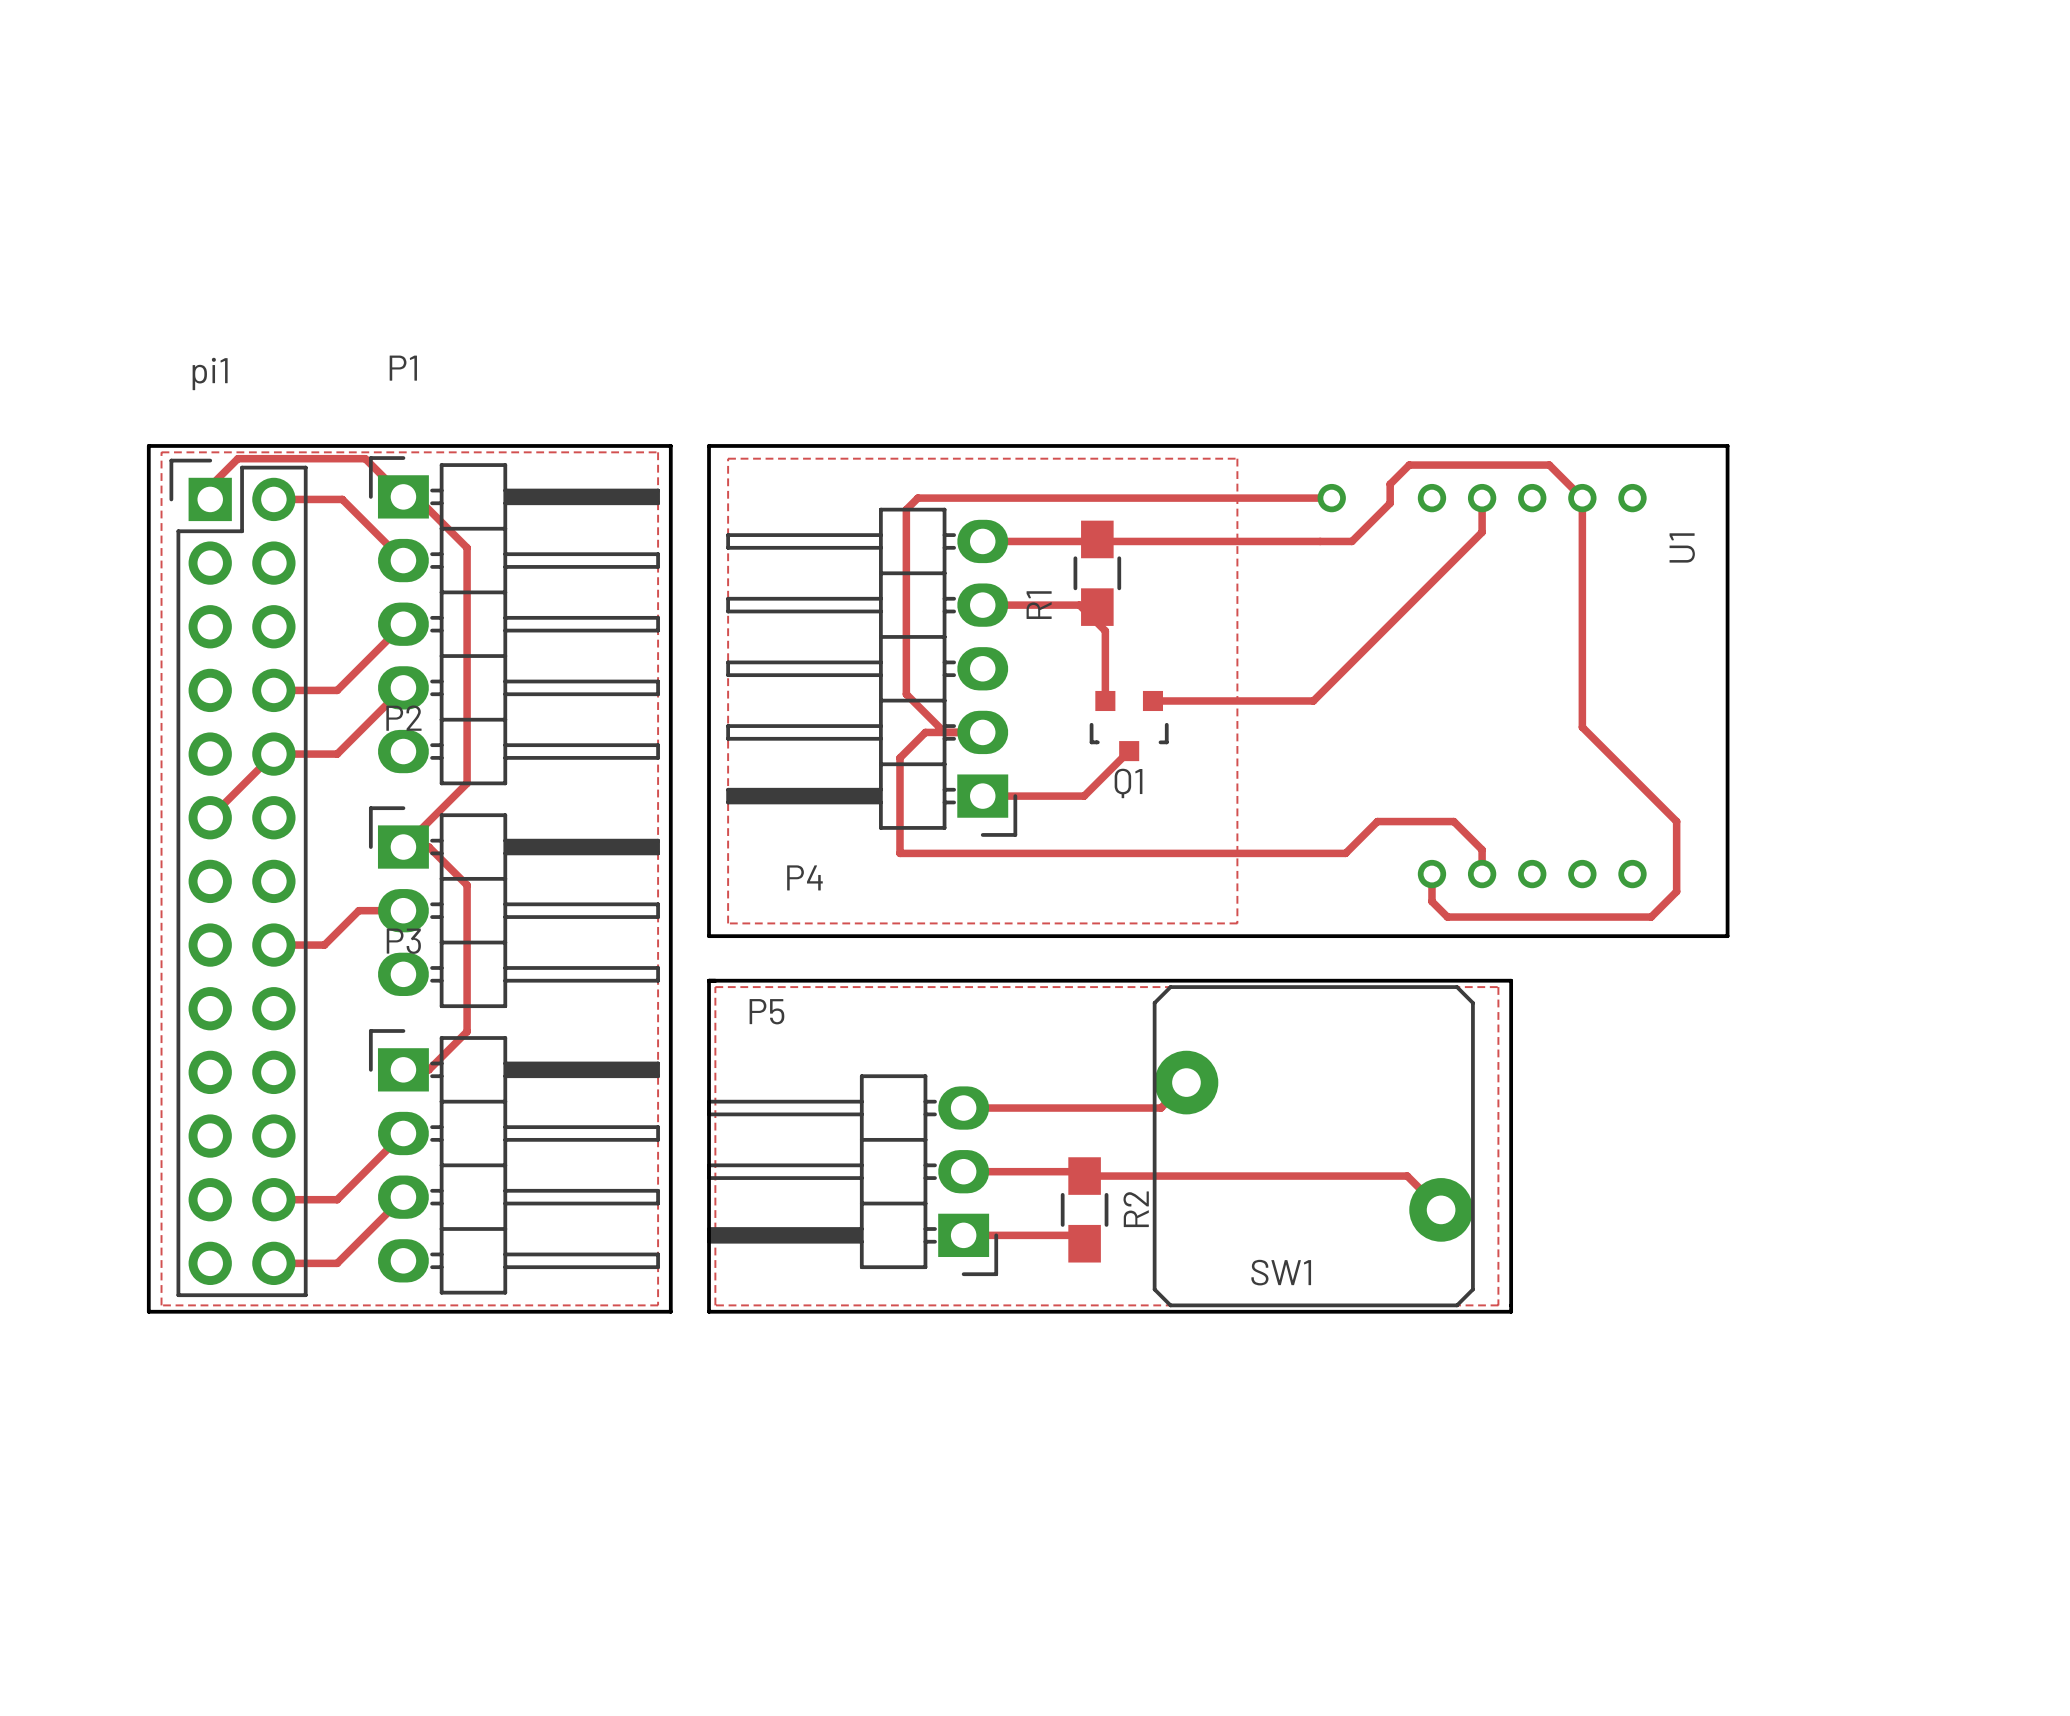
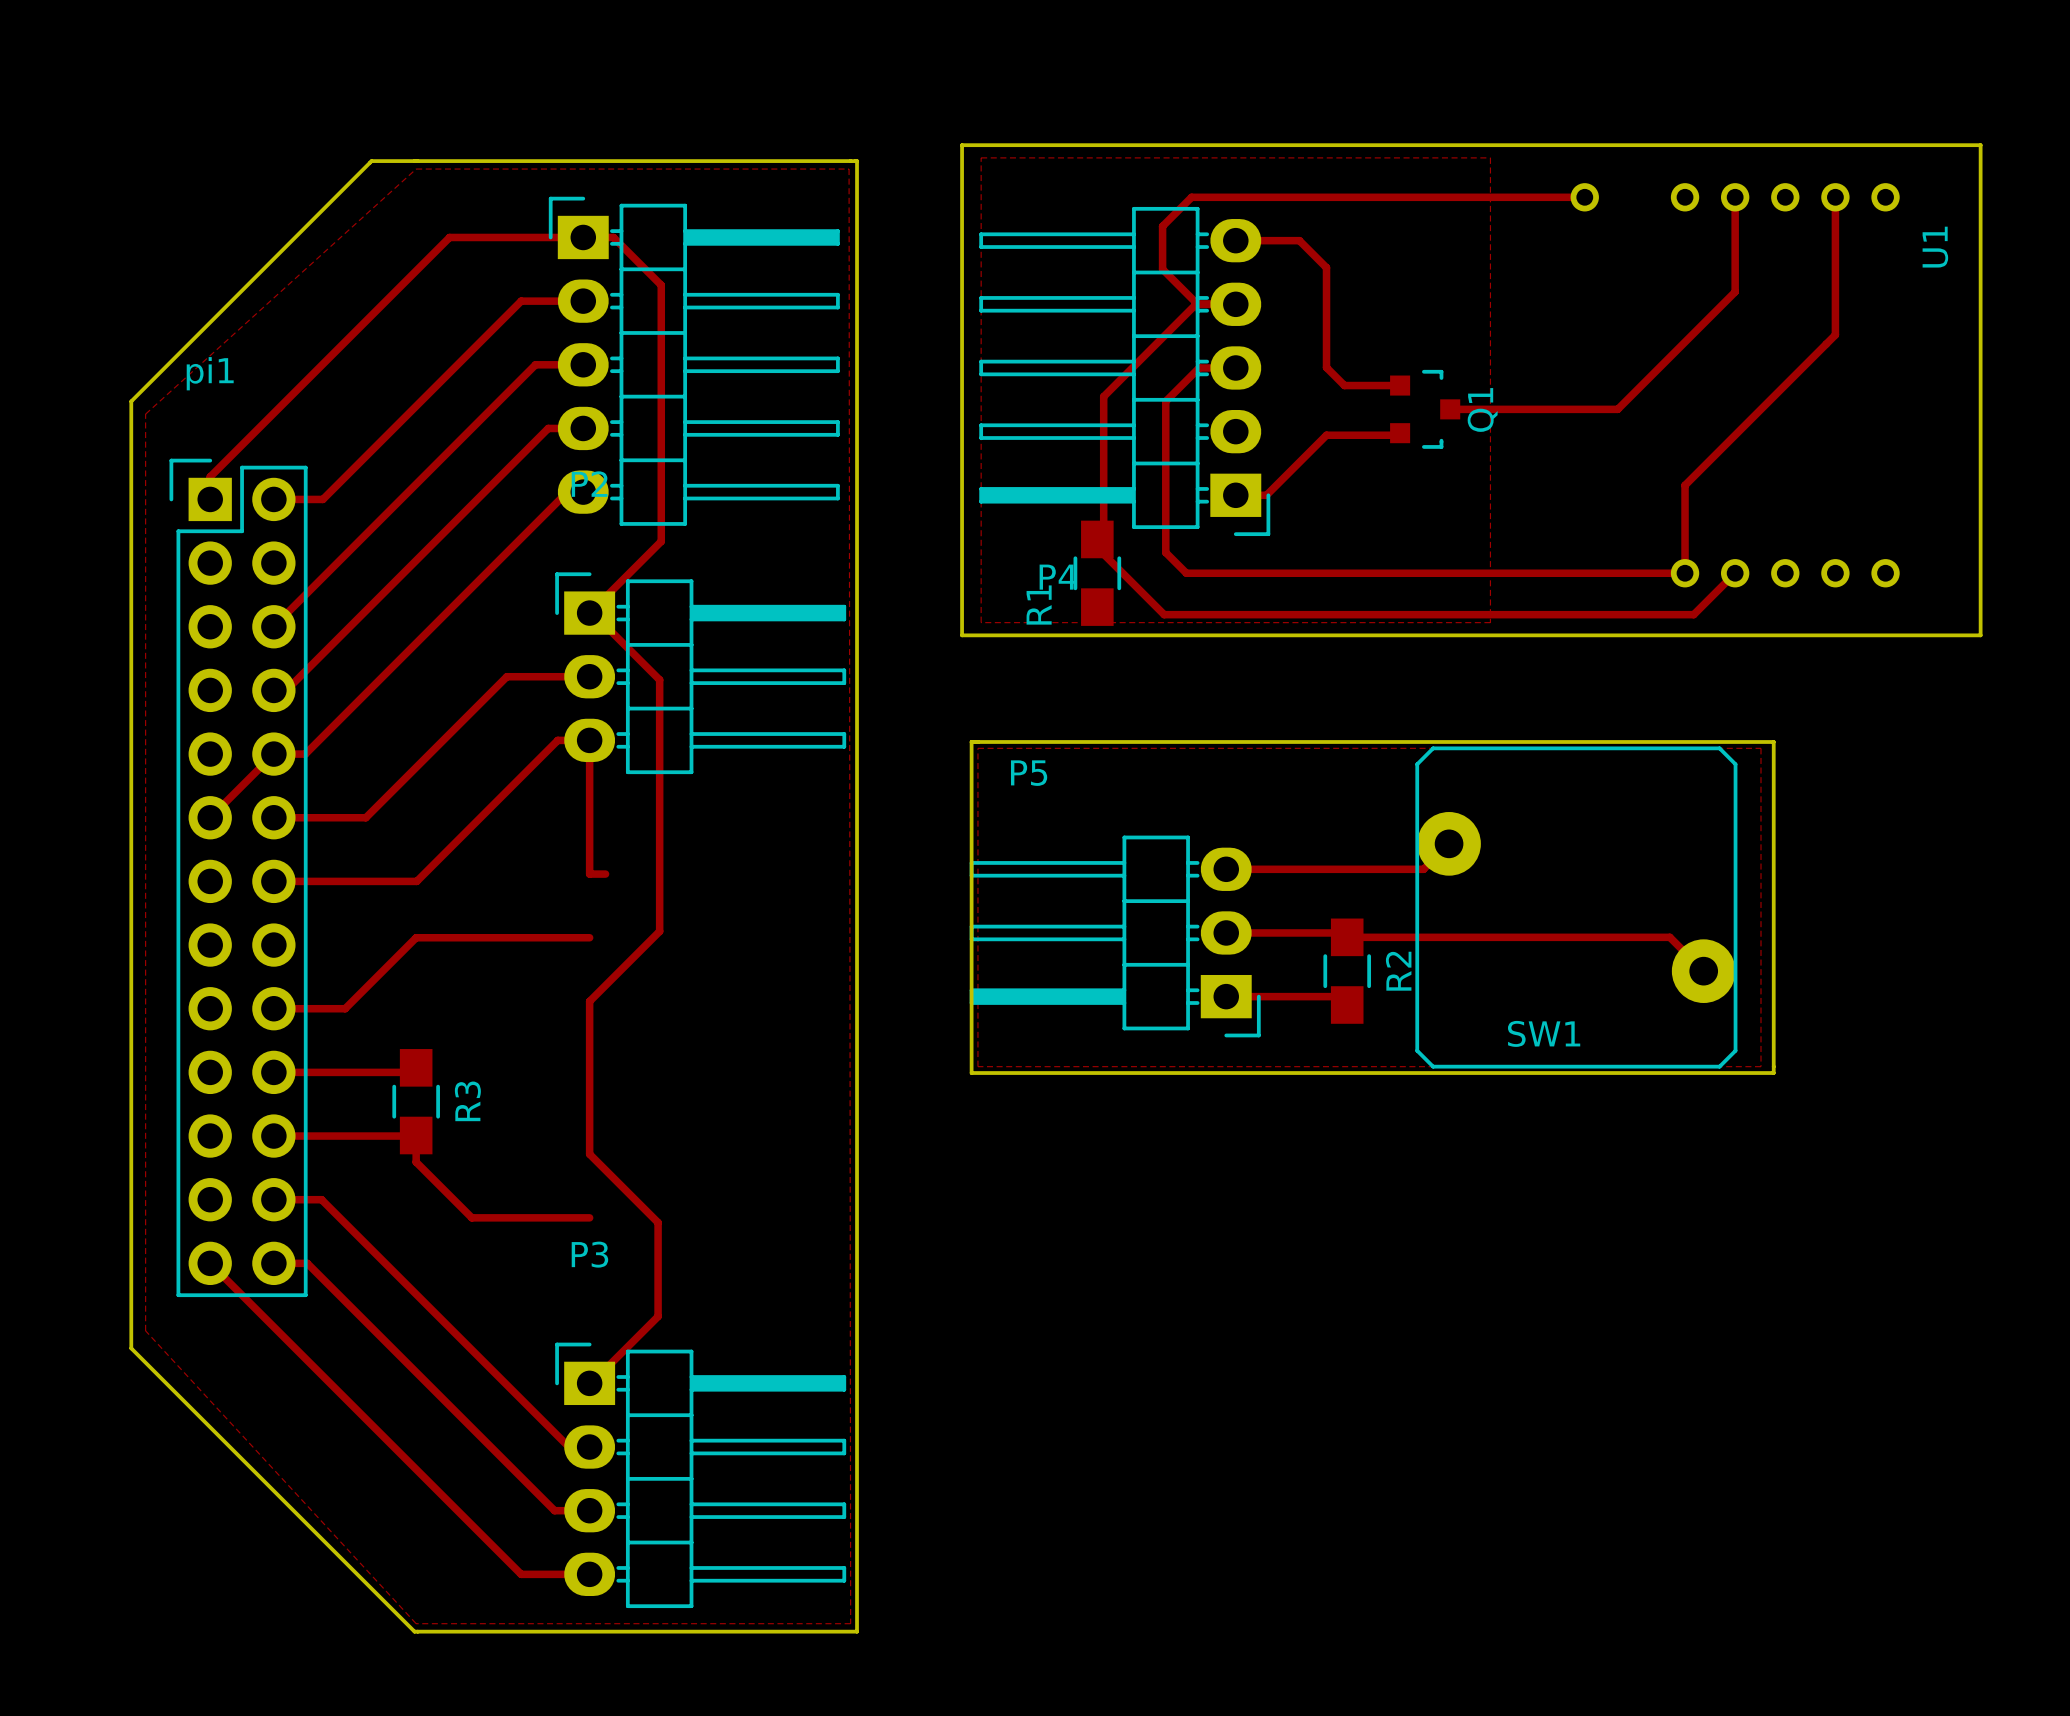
board edge: none -> (371, 161) (857, 161) (857, 1631) (414, 1631) (131, 1348) (131, 401) (371, 161)
top zone outline: none -> (416, 169) (145, 414) (145, 1330) (416, 1623) (850, 1623) (849, 169) (416, 169)
top track: none -> (1584, 197) (1191, 197) (1162, 226) (1162, 269) (1197, 304)
top track: none -> (1735, 197) (1735, 291) (1617, 409) (1450, 409)
top track: none -> (1835, 197) (1835, 334) (1685, 485) (1685, 573) (1186, 573) (1165, 552) (1165, 401) (1199, 367) (1235, 367)
top track: none -> (1235, 240) (1299, 240) (1326, 267) (1326, 367) (1344, 385) (1400, 385)
top track: none -> (1235, 304) (1196, 304) (1103, 396) (1103, 554) (1164, 614) (1693, 614) (1735, 573)
part: none -> (694, 361)
top track: none -> (583, 364) (535, 364) (273, 626)
top track: none -> (1400, 433) (1398, 435) (1326, 435) (1266, 495) (1235, 495)
board edge: (148, 445) (670, 445) (670, 1311) (148, 1311) (148, 445) -> none
board edge: (709, 445) (709, 936) (1727, 936) (1727, 445) (709, 445) -> (962, 145) (962, 635) (1980, 635) (1980, 145) (962, 145)
top zone outline: (161, 452) (161, 1305) (658, 1305) (658, 452) (161, 452) -> none
top zone outline: (728, 458) (728, 923) (1237, 923) (1237, 458) (728, 458) -> (981, 157) (981, 622) (1490, 622) (1490, 157) (981, 157)
top track: (210, 486) (237, 458) (365, 458) (403, 496) (416, 496) (467, 547) (467, 783) (403, 847) -> (210, 486) (210, 476) (449, 237) (613, 237) (661, 285) (661, 541) (589, 613) (592, 613) (659, 679) (659, 931) (589, 1001) (589, 1154) (658, 1222) (658, 1316) (589, 1383)
top track: (1331, 498) (917, 498) (906, 509) (906, 694) (944, 732) -> none
top track: (1482, 498) (1482, 532) (1313, 700) (1152, 700) -> none
top track: (322, 499) (342, 499) (403, 560) -> (322, 499) (521, 301) (583, 301)
top track: (963, 541) (1351, 541) (1390, 503) (1390, 484) (1409, 465) (1549, 465) (1582, 498) (1582, 727) (1676, 821) (1676, 891) (1651, 917) (1447, 917) (1431, 901) (1431, 874) -> none
top track: (963, 605) (1079, 605) (1105, 630) (1105, 700) -> none
P1: (514, 620) -> none
top track: (403, 624) (337, 690) (286, 690) -> (583, 428) (548, 428) (286, 690)
P4 position: (871, 672) -> (1124, 371)
top track: none -> (589, 676) (506, 676) (365, 817) (273, 817)
U1 position: (1482, 686) -> (1735, 385)
top track: (403, 687) (337, 754) (305, 754) -> (583, 492) (567, 492) (305, 754)
Q1 rotation: 0° (1129, 726) -> 90° counterclockwise (1425, 409)
Q1 position: (1129, 726) -> (1425, 409)
top track: (963, 732) (925, 732) (899, 757) (899, 853) (1345, 853) (1377, 821) (1453, 821) (1482, 849) (1482, 874) -> none
top track: (1129, 751) (1084, 796) (963, 796) -> none
top track: (403, 847) (428, 847) (467, 885) (467, 1031) (428, 1069) (403, 1069) -> none
top track: none -> (605, 874) (589, 874) (589, 740) (557, 740) (416, 881) (273, 881)
P2 position: (514, 907) -> (700, 673)
top track: (403, 910) (358, 910) (324, 945) (273, 945) -> none
top track: none -> (589, 937) (416, 937) (345, 1008) (273, 1008)
board edge: (709, 980) (1511, 980) (1511, 1311) (709, 1311) (709, 980) -> (971, 741) (1773, 741) (1773, 1073) (971, 1073) (971, 741)
top zone outline: (715, 987) (715, 1305) (1498, 1305) (1498, 987) (715, 987) -> (977, 748) (977, 1066) (1761, 1066) (1761, 748) (977, 748)
top track: none -> (416, 1067) (411, 1072) (273, 1072)
top track: (1186, 1082) (1160, 1108) (963, 1108) -> (1449, 843) (1423, 869) (1226, 869)
R3: none -> (416, 1101)
top track: (403, 1133) (337, 1199) (321, 1199) -> (589, 1447) (568, 1447) (321, 1199)
top track: none -> (273, 1136) (416, 1135) (416, 1162) (471, 1217) (589, 1217)
SW1 position: (1313, 1146) -> (1576, 907)
P3 position: (514, 1161) -> (700, 1475)
top track: (963, 1171) (1080, 1171) (1084, 1176) (1407, 1176) (1441, 1209) -> (1226, 932) (1342, 932) (1347, 937) (1669, 937) (1703, 971)
P5 position: (852, 1175) -> (1115, 936)
top track: (403, 1197) (337, 1263) (307, 1263) -> (589, 1510) (554, 1510) (307, 1263)
R2 position: (1084, 1209) -> (1347, 971)
top track: (963, 1235) (1076, 1235) (1084, 1243) -> (1226, 996) (1338, 996) (1347, 1005)
top track: none -> (210, 1263) (521, 1574) (589, 1574)

